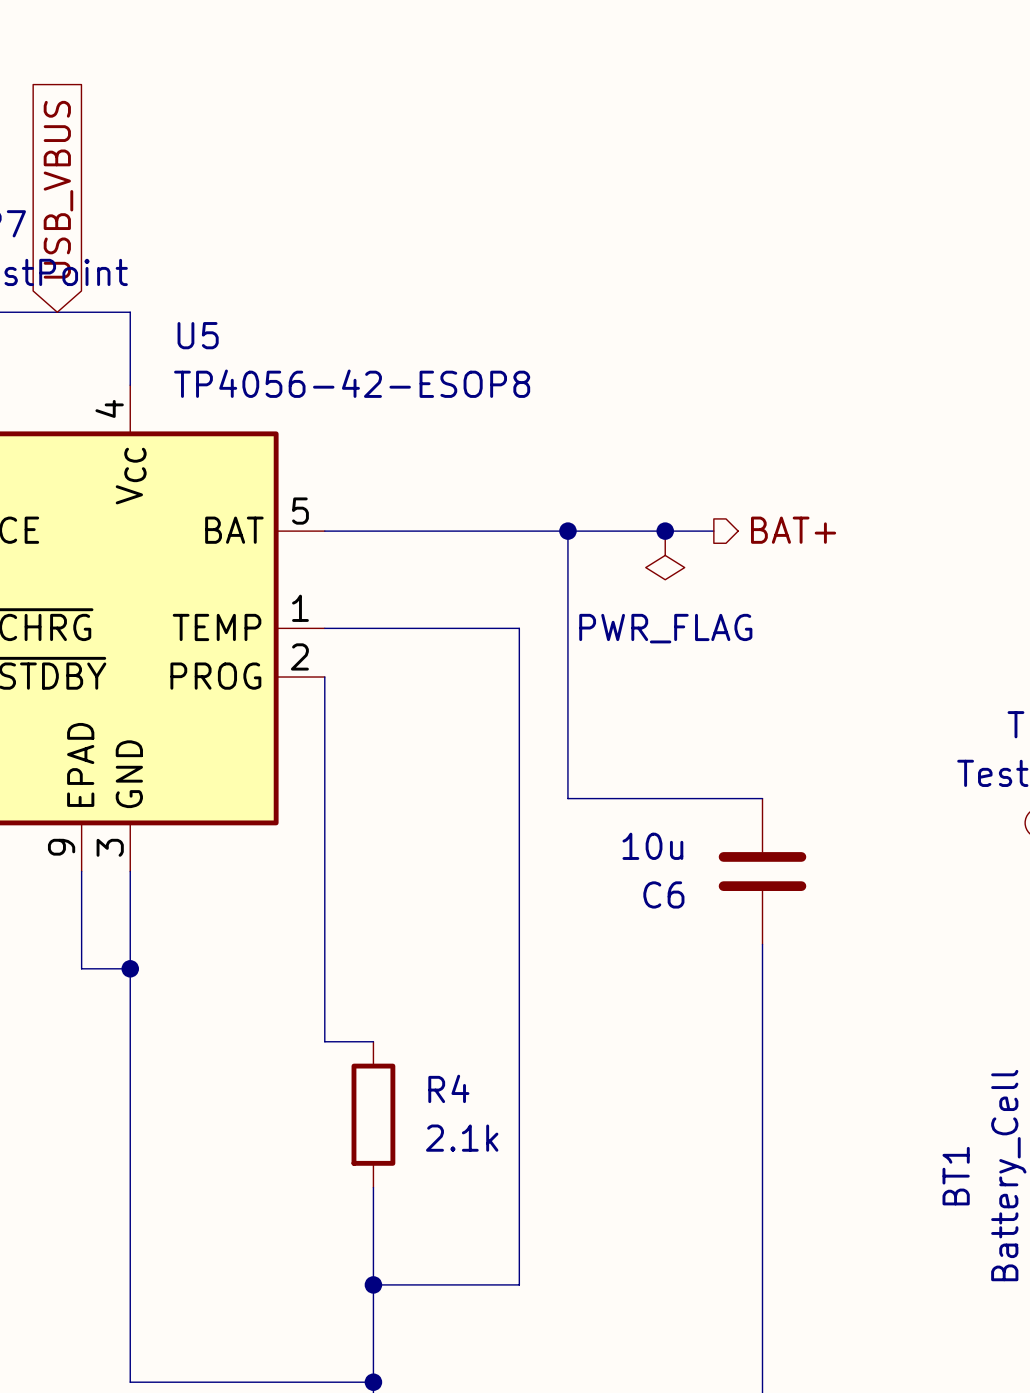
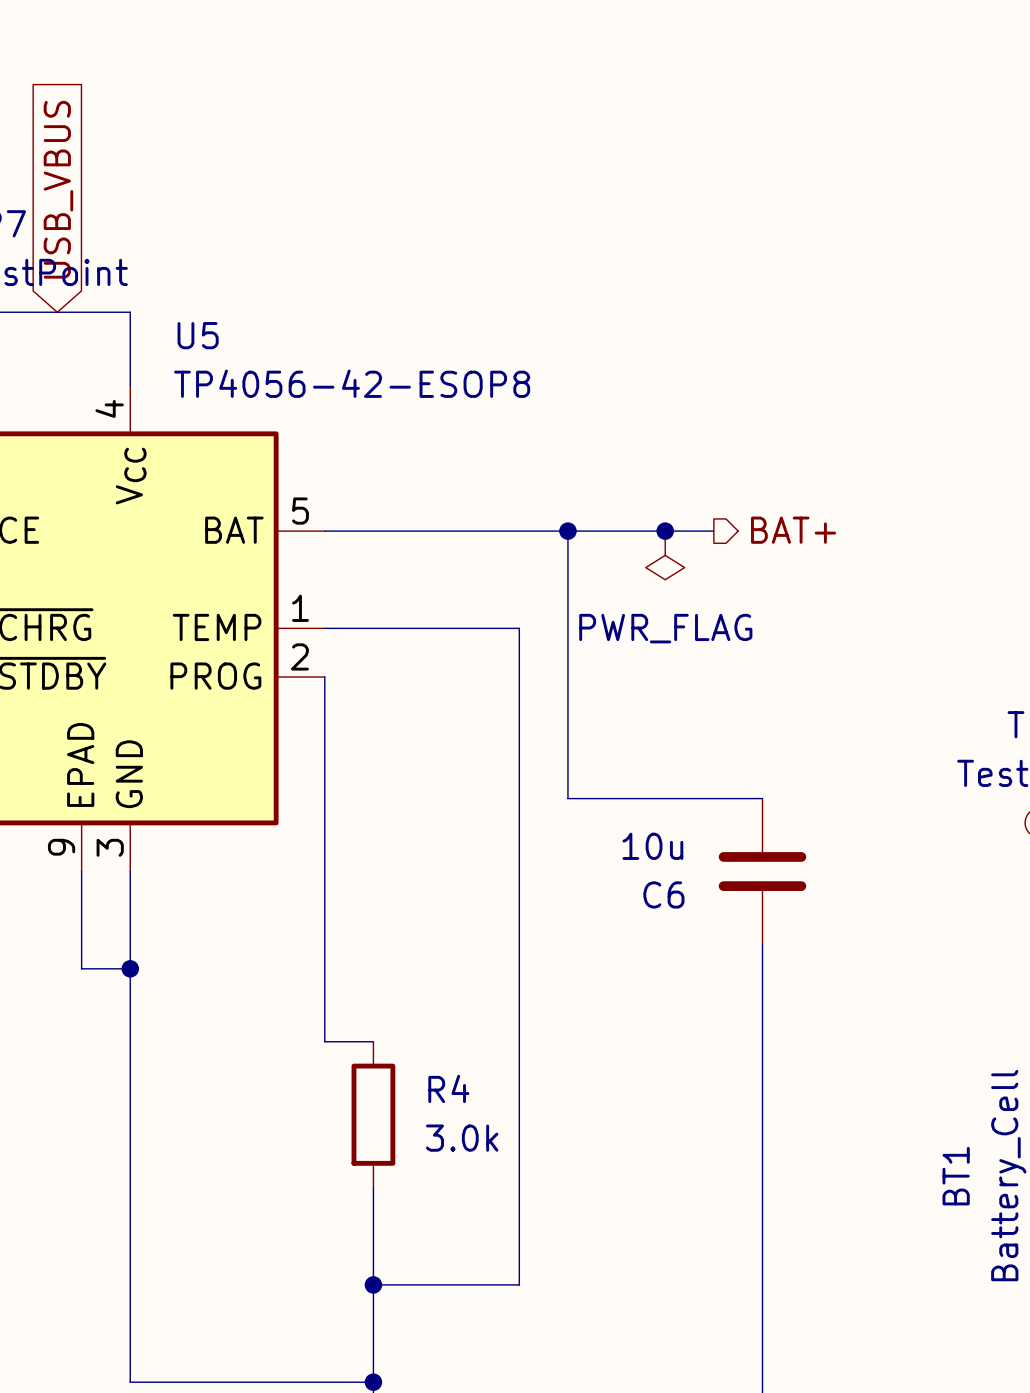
R4 value: 2.1k (462, 1138) -> 3.0k (462, 1138)

